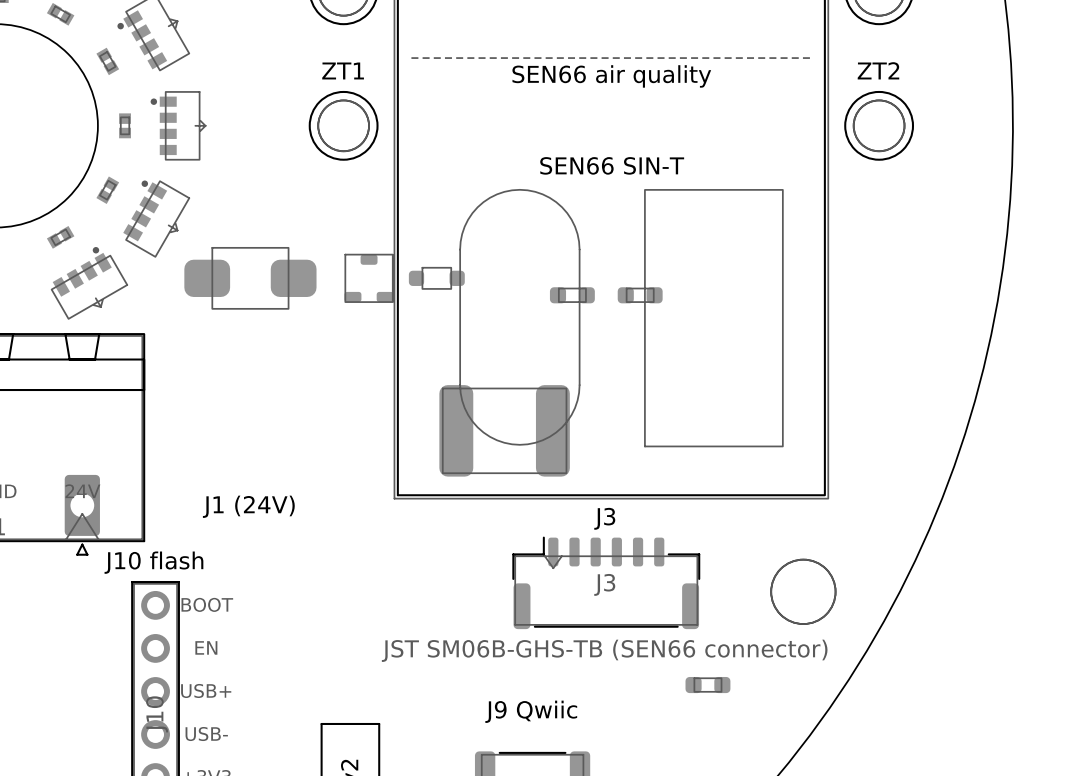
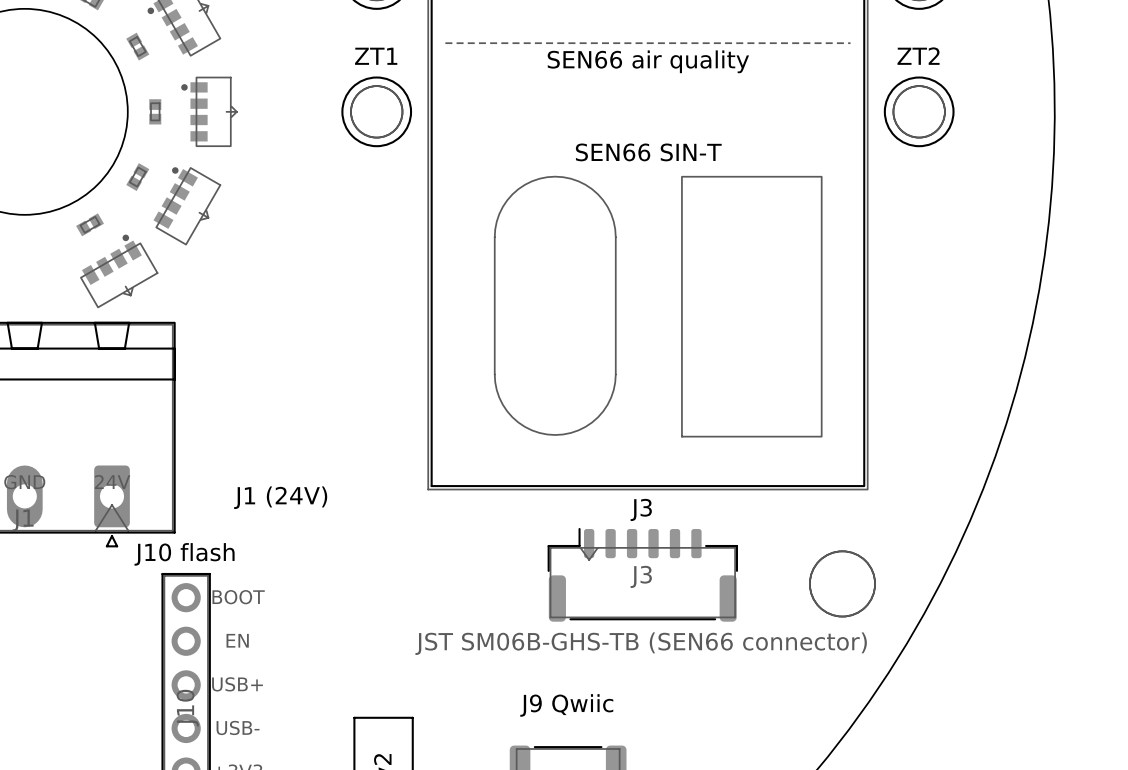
part: (250, 278) -> none
part: (369, 278) -> none
part: (436, 278) -> none
part: (572, 295) -> none
part: (640, 295) -> none
part: (504, 430) -> none
part: (707, 685) -> none

